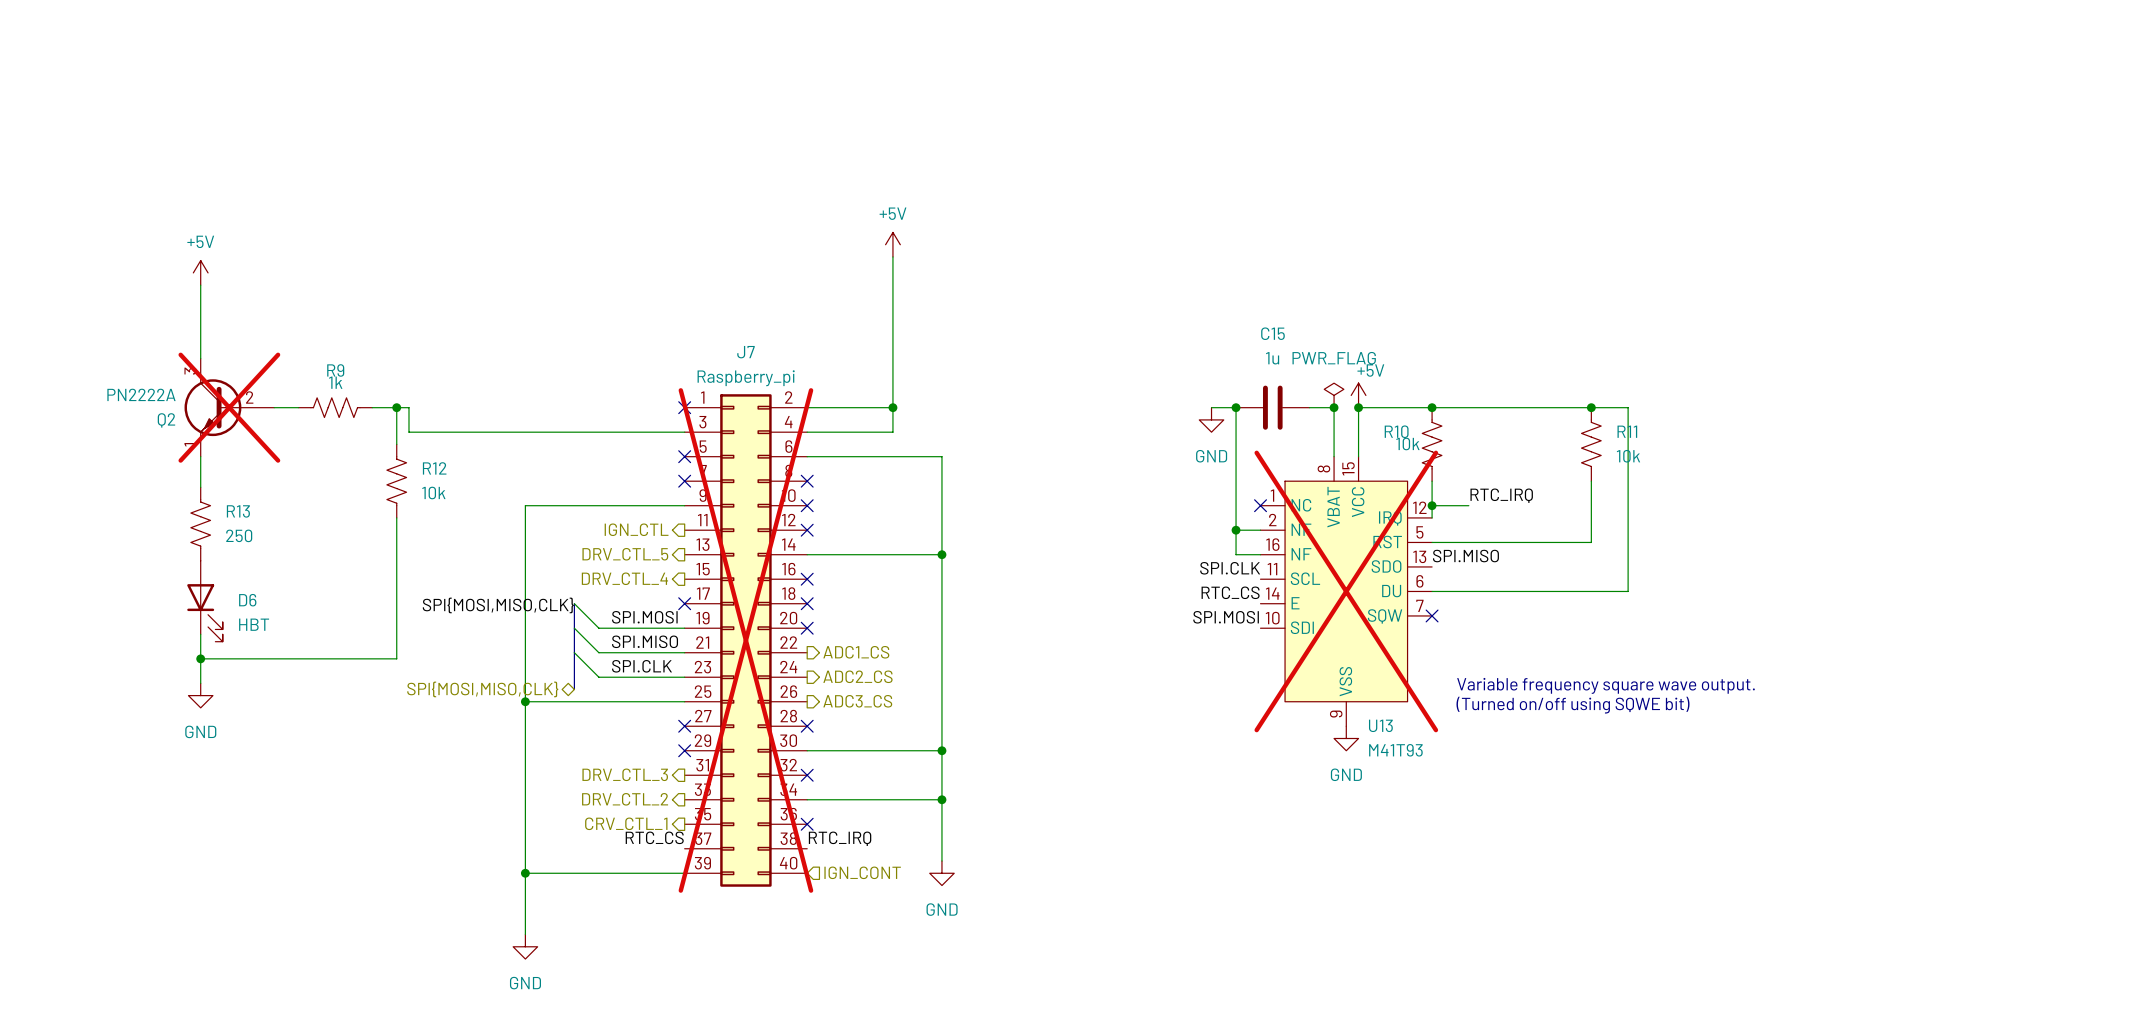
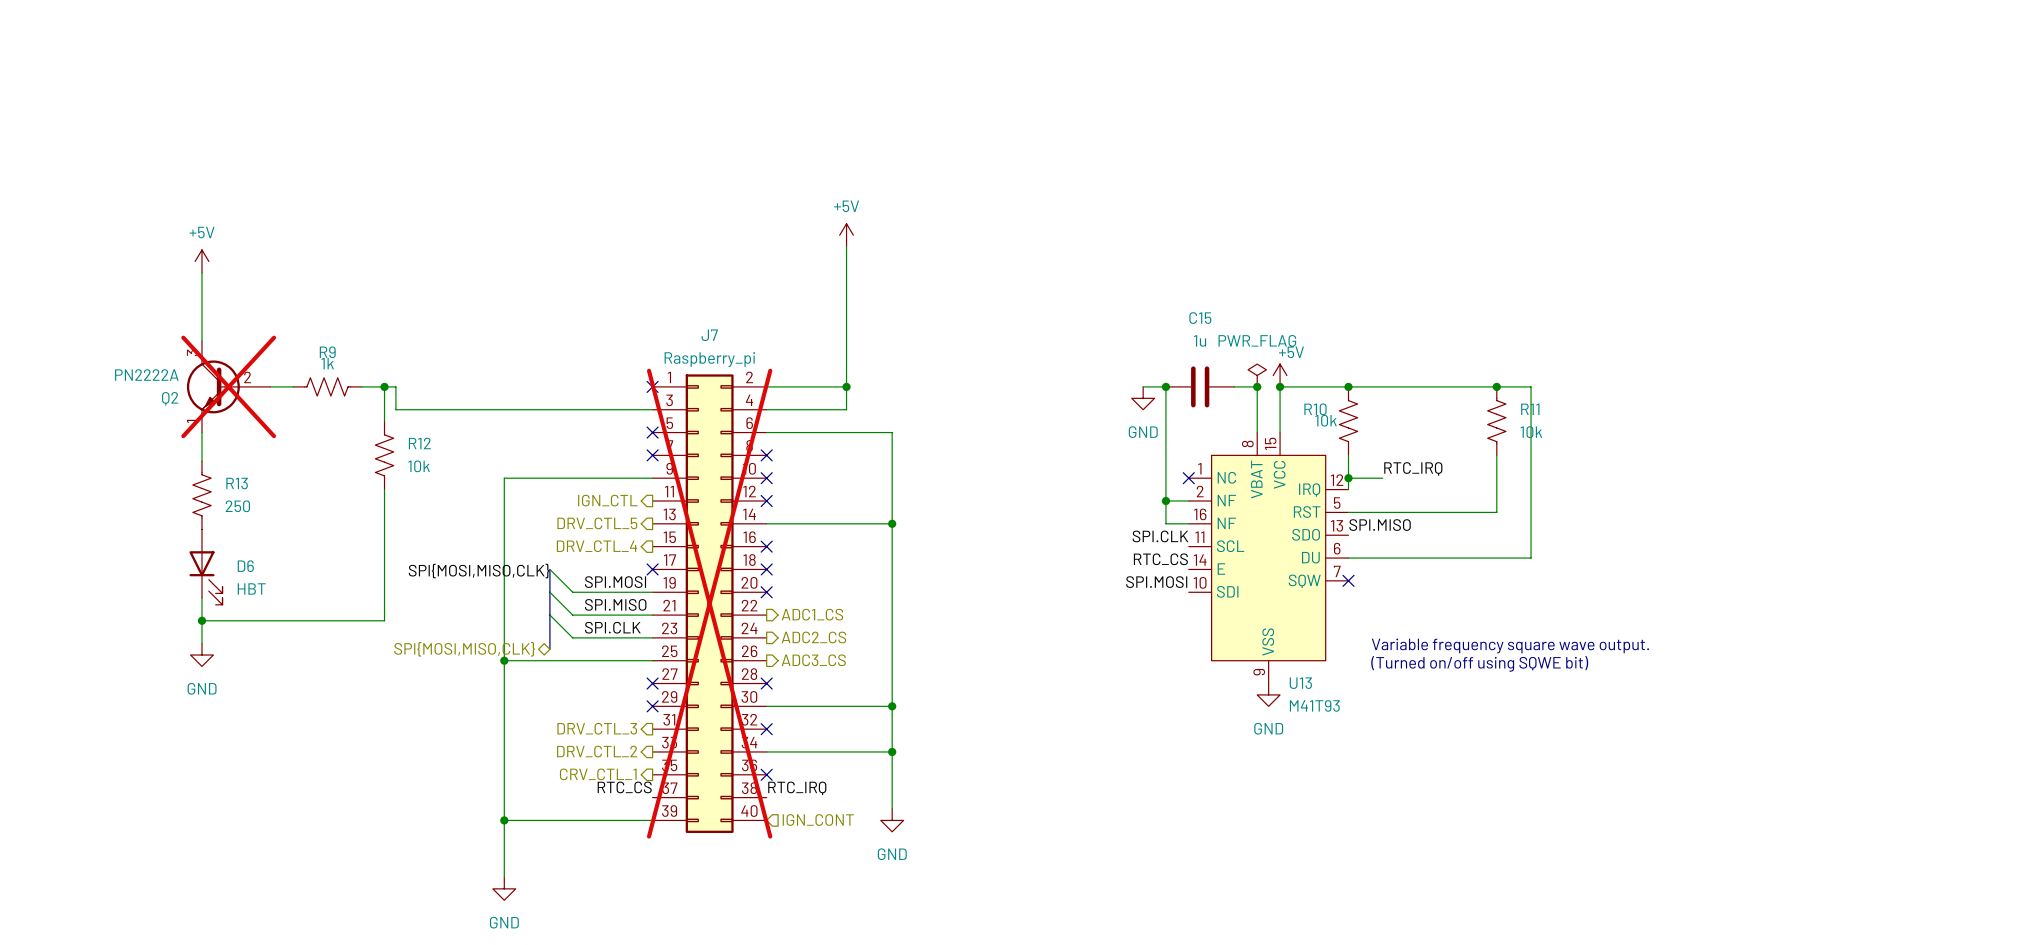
U13 do-not-place cross: (1346, 591) -> none

